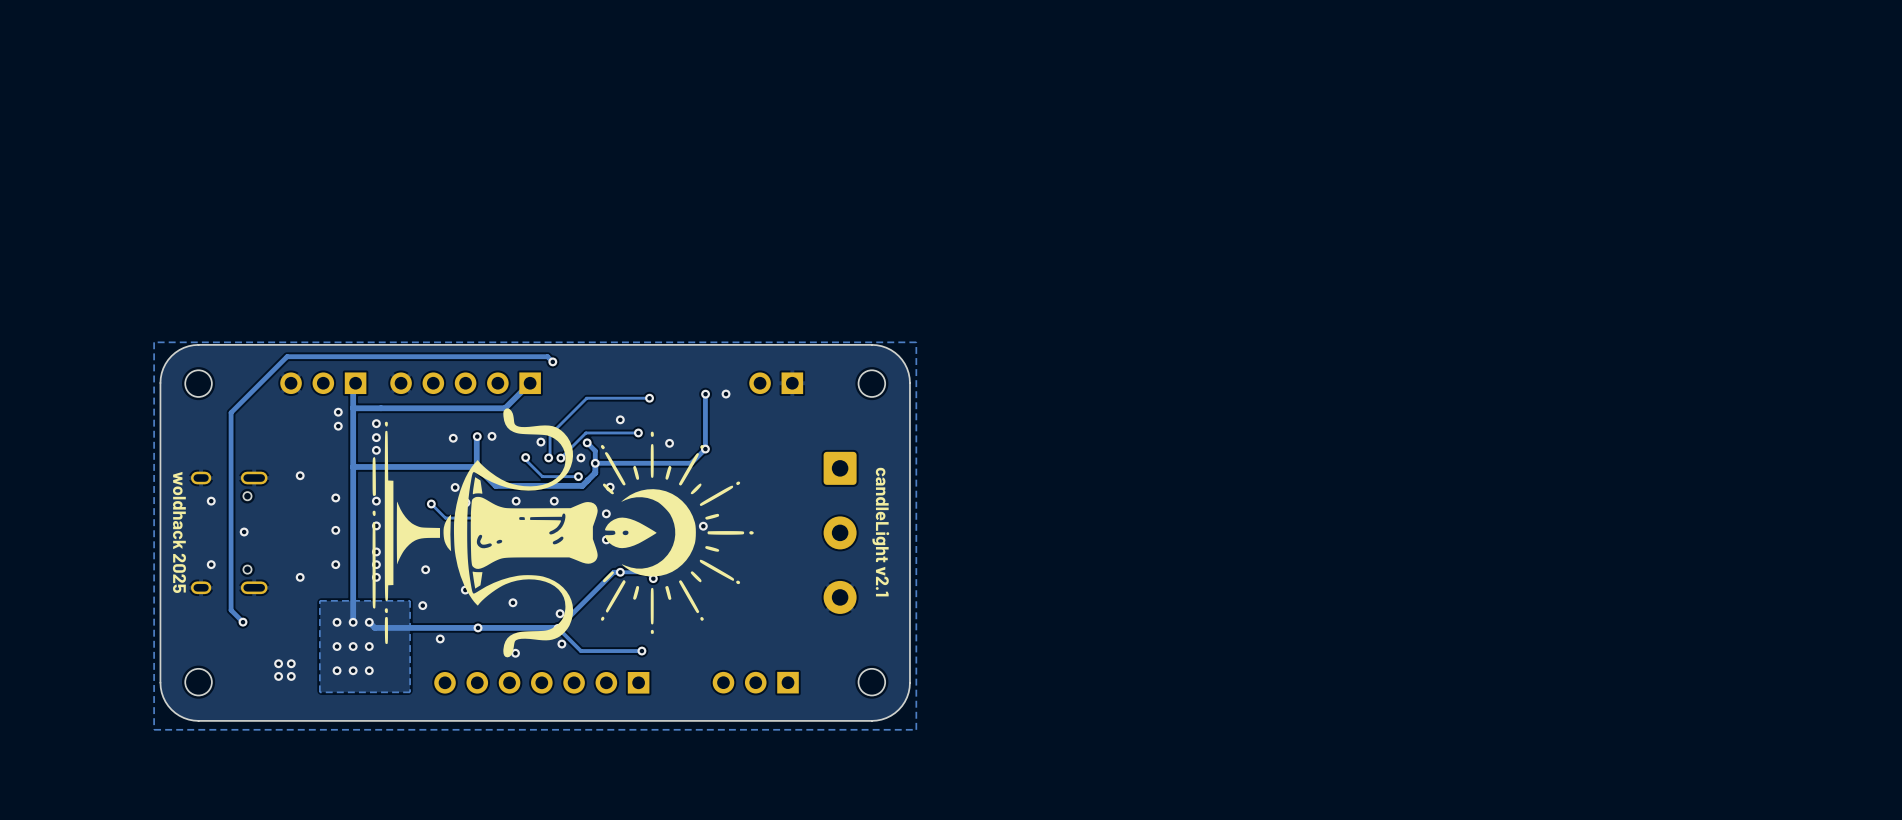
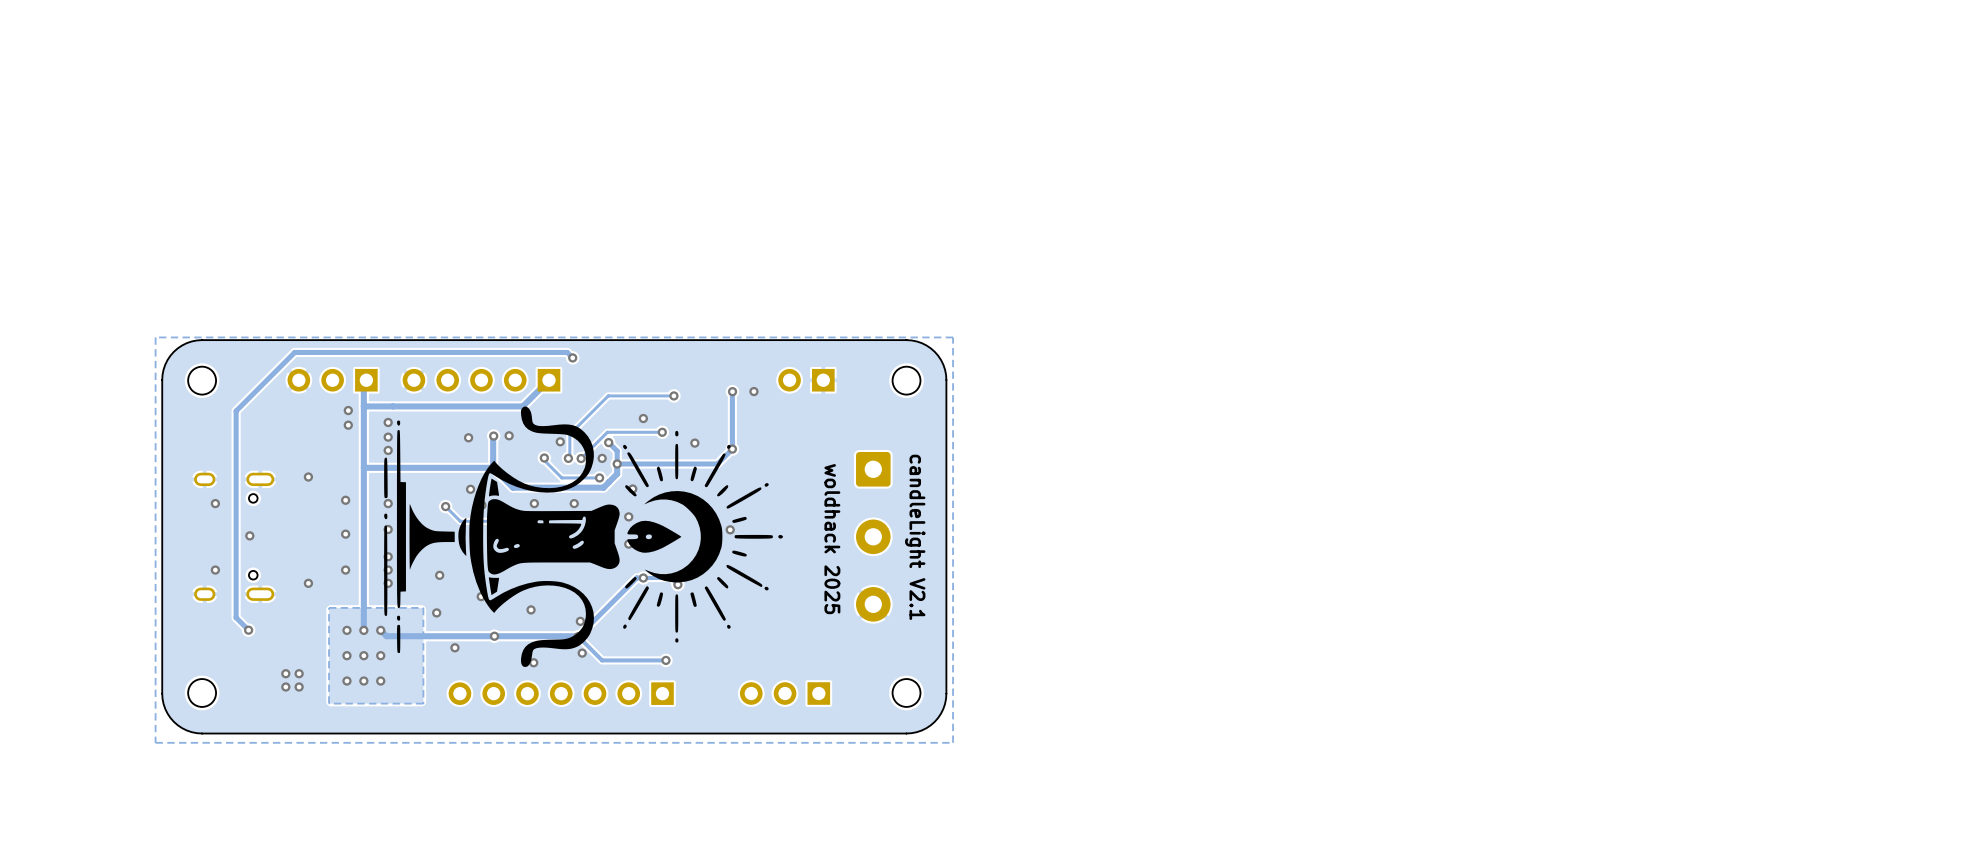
text: none -> woldhack 2025 (832, 539)
text: woldhack 2025 (179, 532) -> none
text: candleLight v2.1 (880, 532) -> candleLight V2.1 (915, 537)

